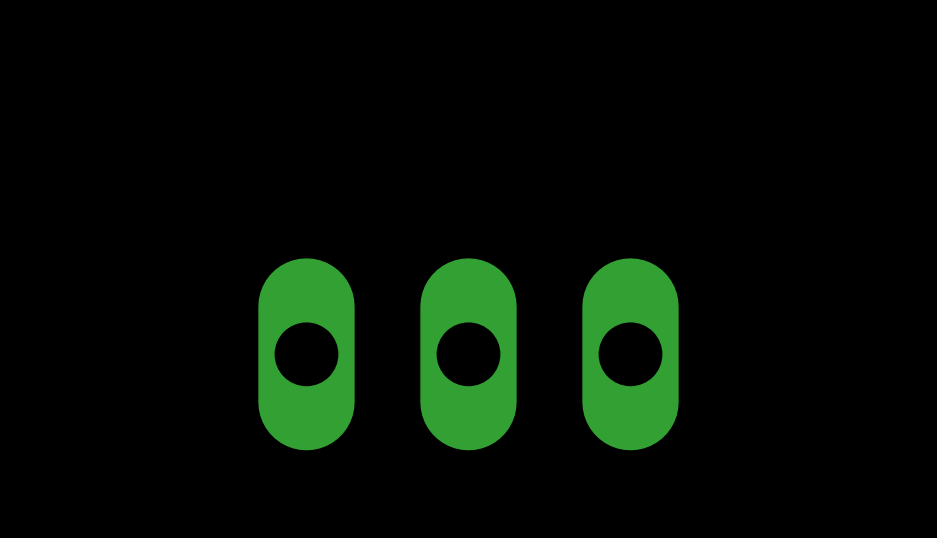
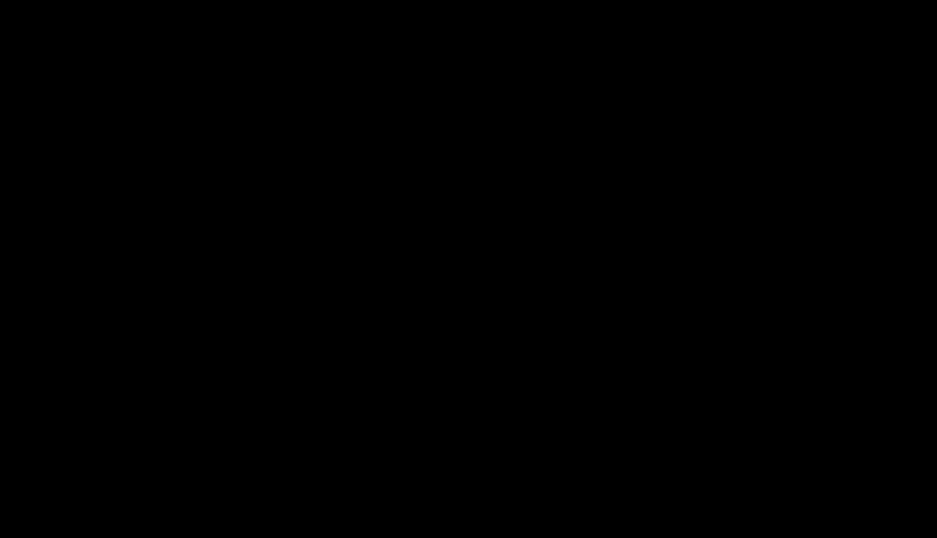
part: (468, 354) -> none

